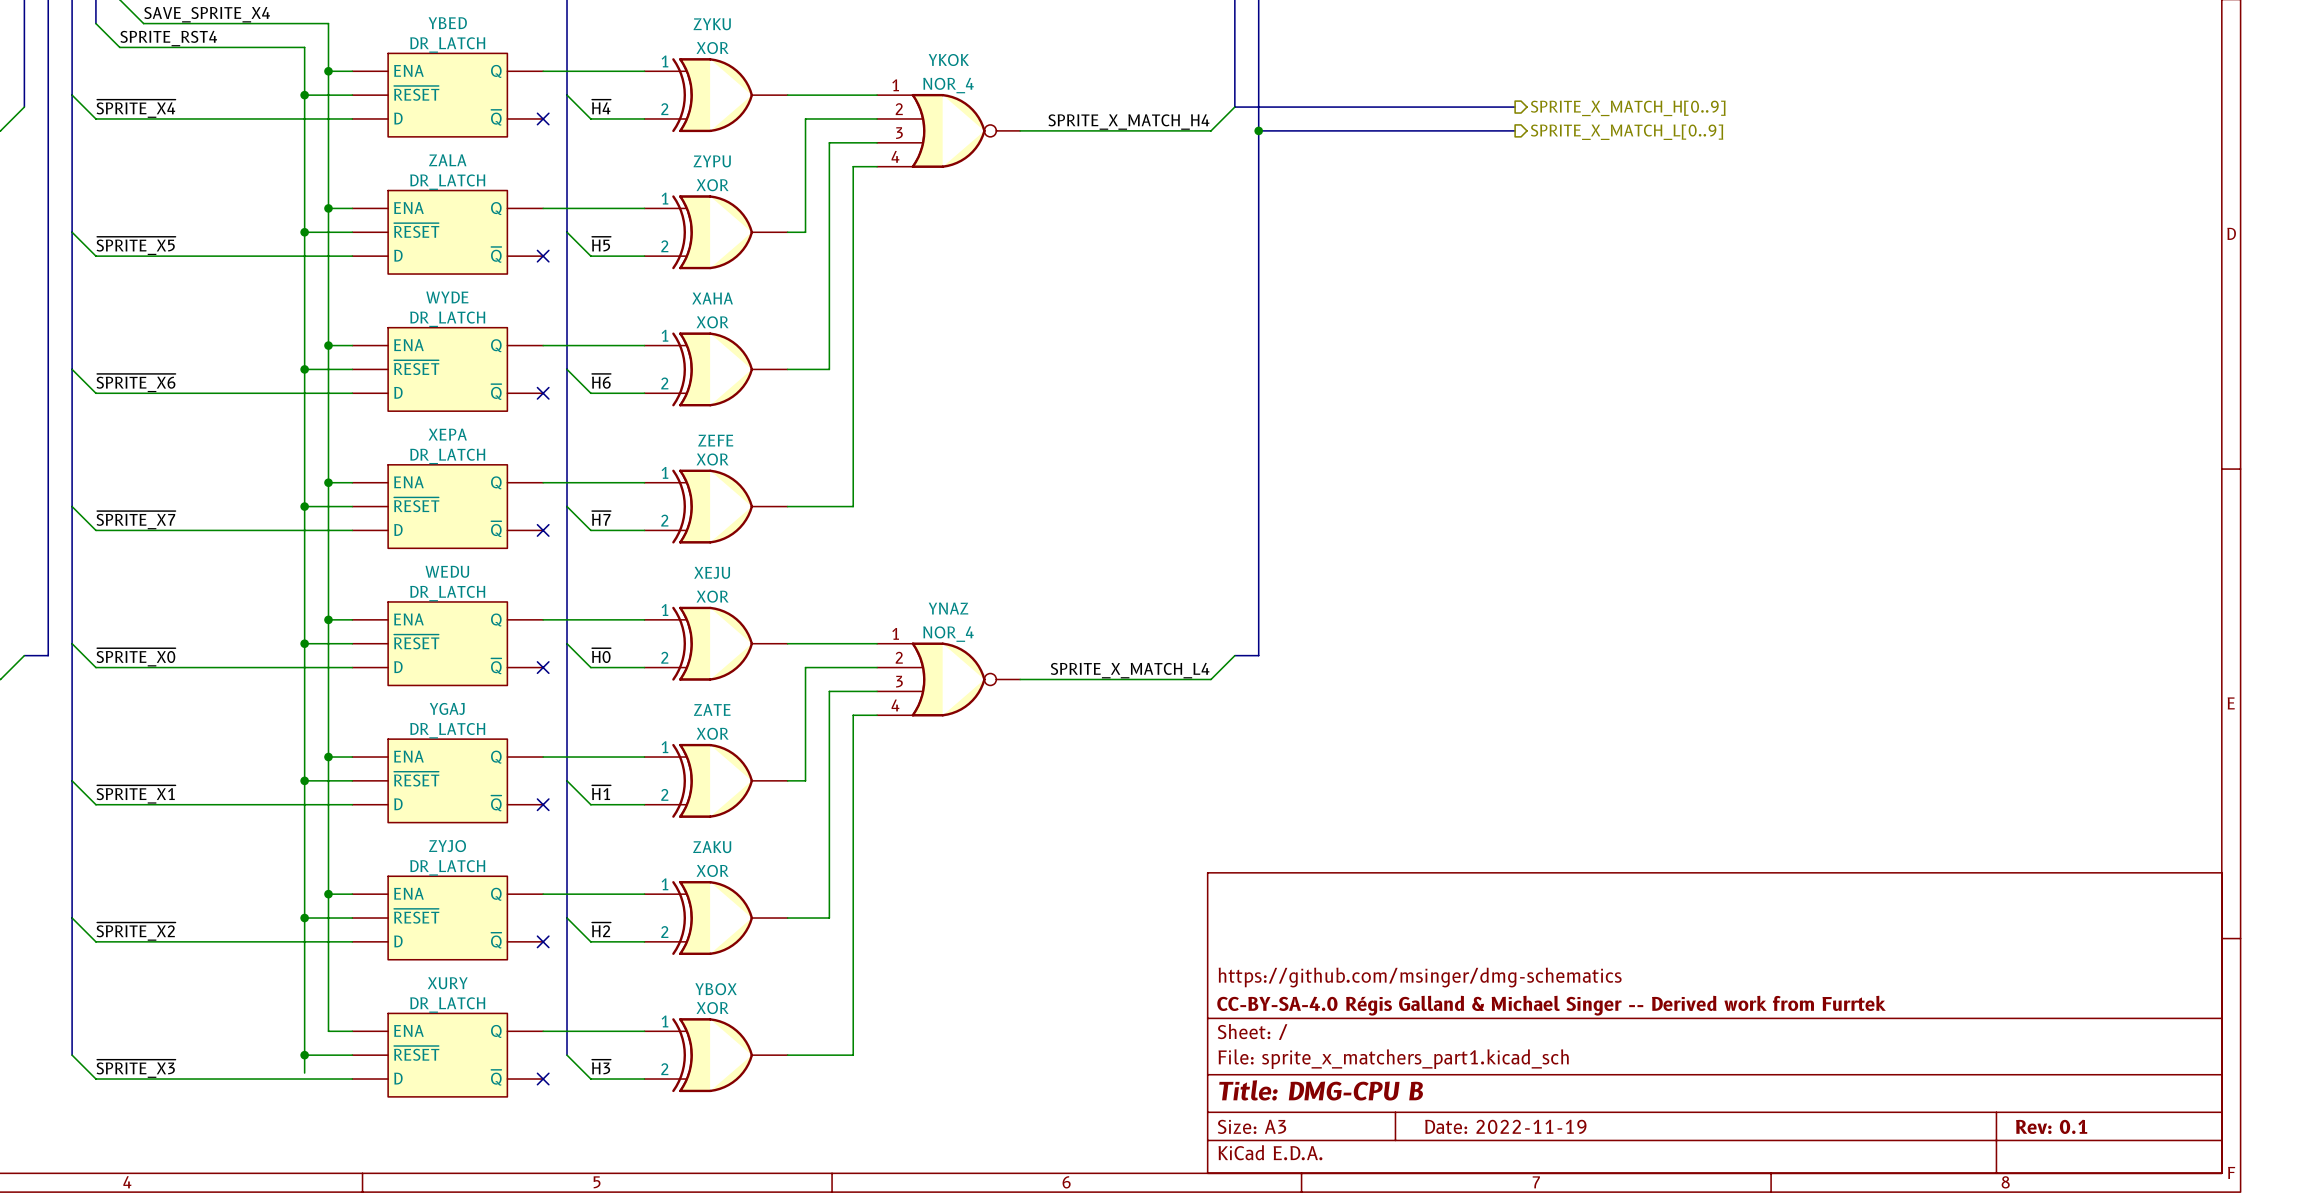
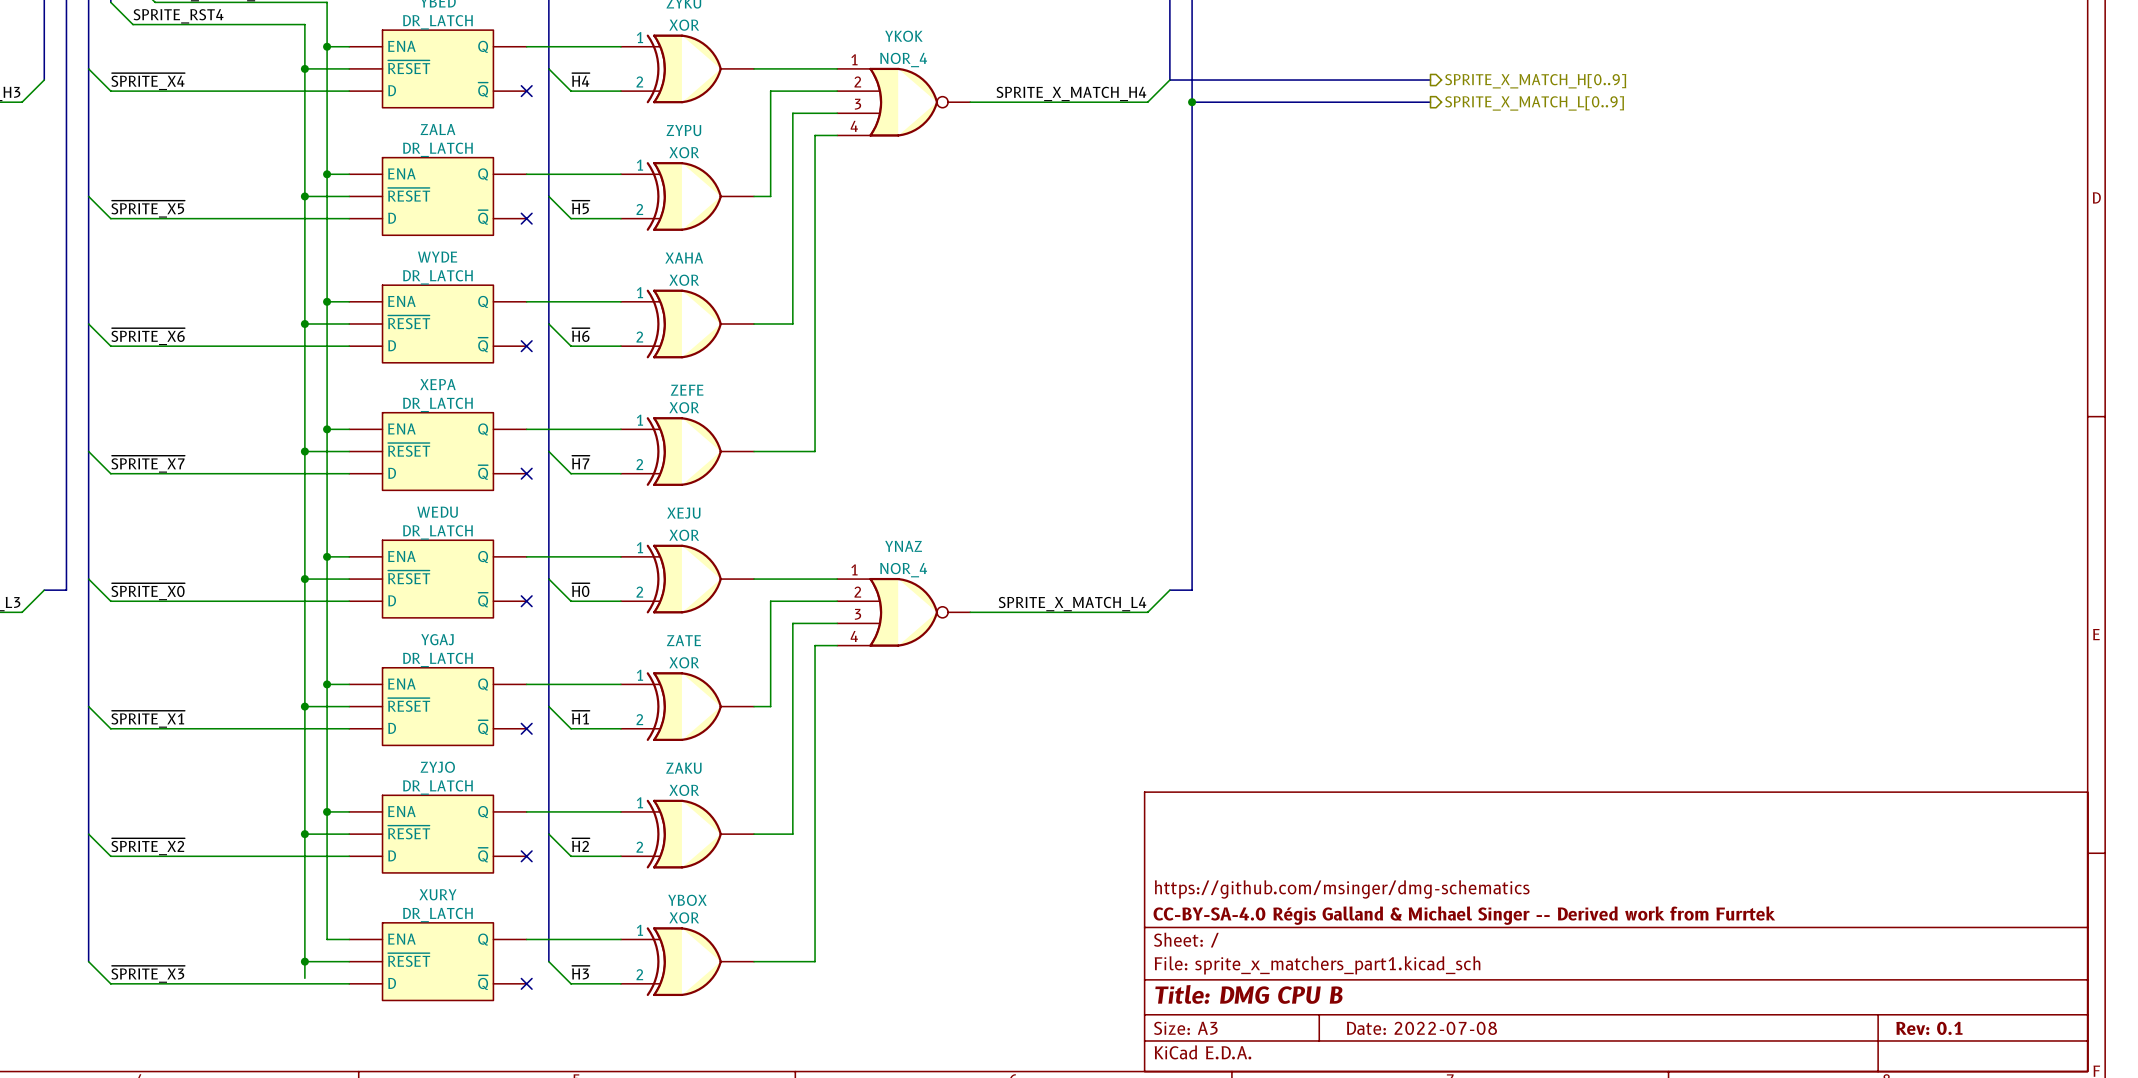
title block: Title: DMG-CPU B (1321, 1090) -> Title: DMG CPU B (1248, 994)
title block: Date: 2022-11-19 (1505, 1126) -> Date: 2022-07-08 (1421, 1028)

